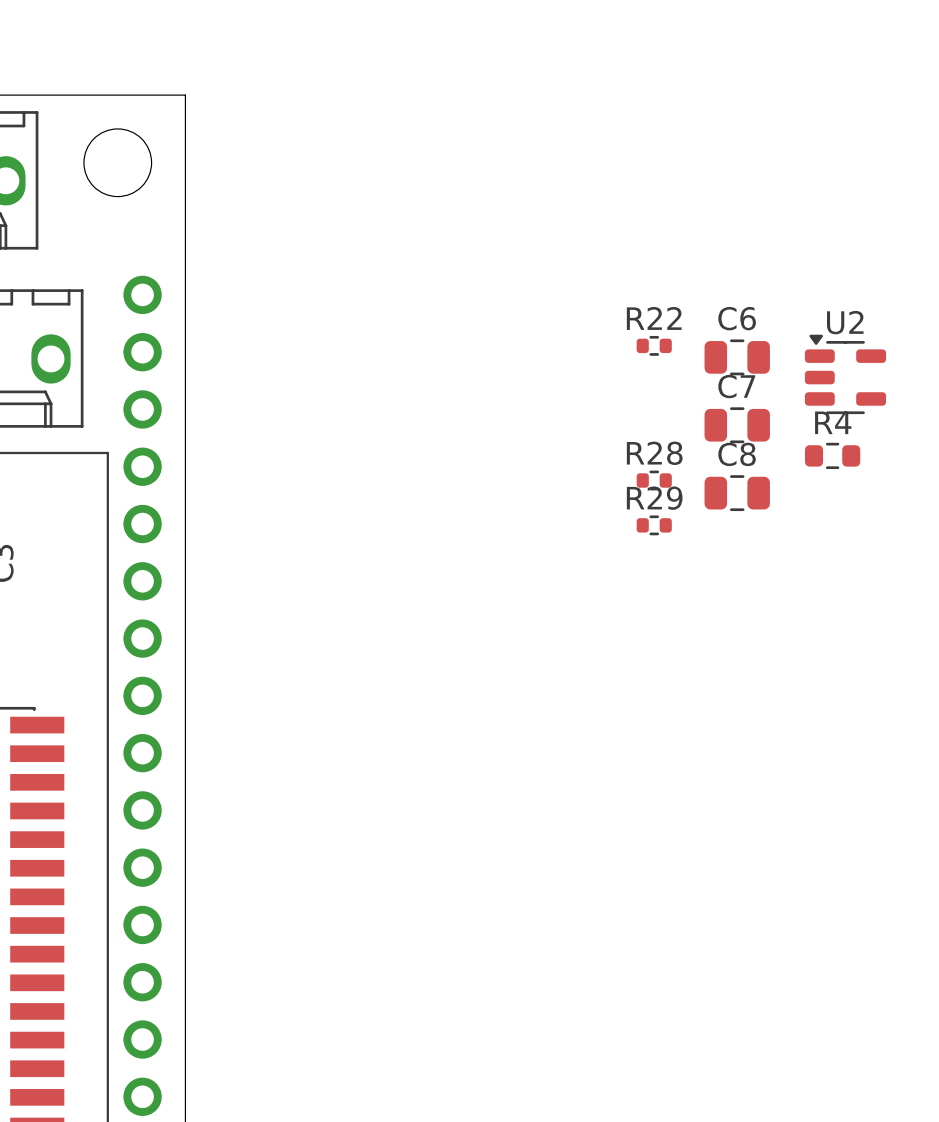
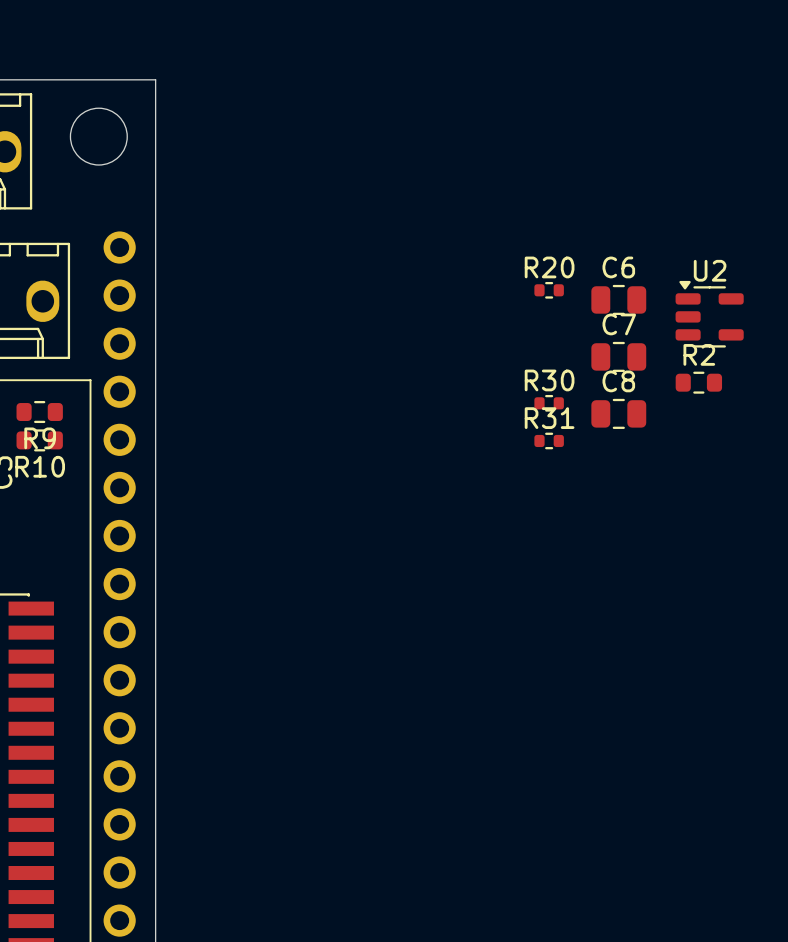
R22 name: R22 (654, 318) -> R20 (549, 267)
R4 name: R4 (833, 422) -> R2 (699, 354)
R28 name: R28 (654, 453) -> R30 (549, 380)
R9: none -> (39, 412)
R29 name: R29 (654, 498) -> R31 (549, 418)
R10: none -> (39, 440)

